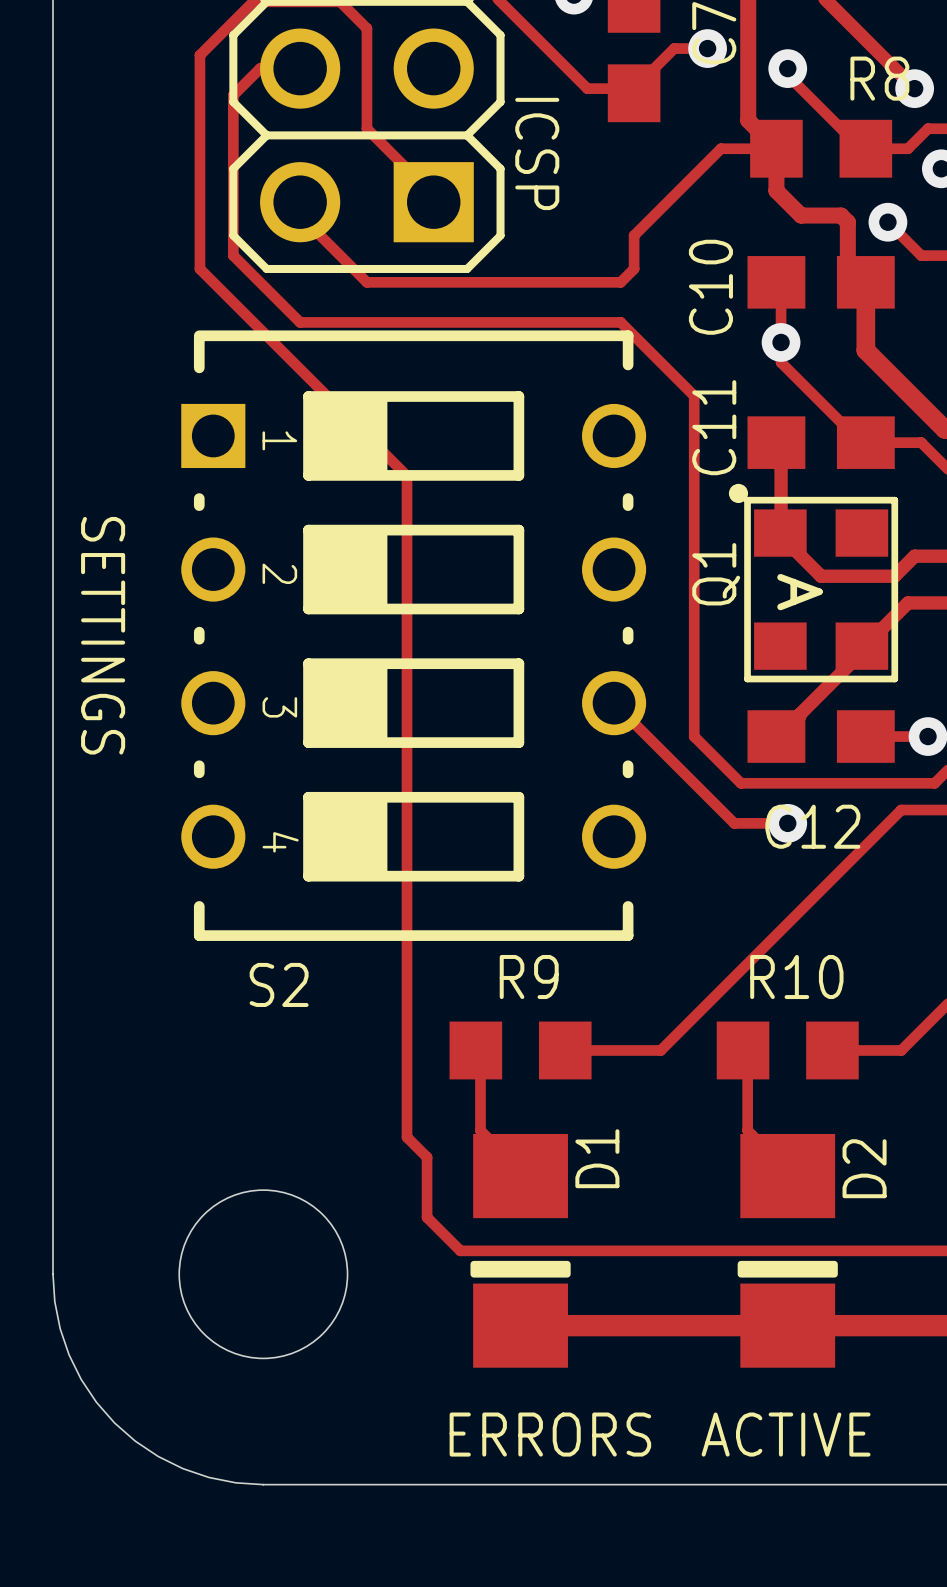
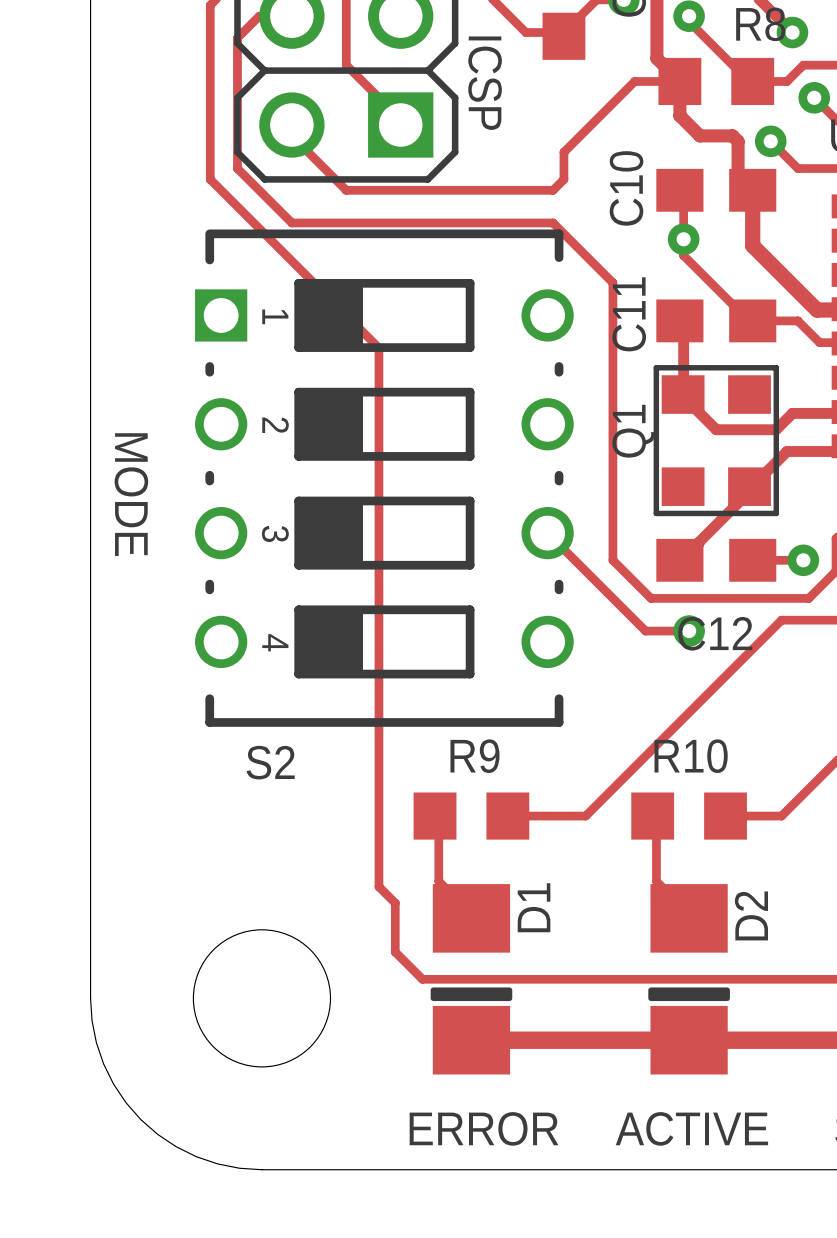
Q1 footprint: [728, 483, 899, 683] -> [653, 365, 780, 517]
text: SETTINGS (103, 635) -> none
text: none -> MODE (131, 494)
text: ERRORS (550, 1434) -> ERROR (484, 1128)

